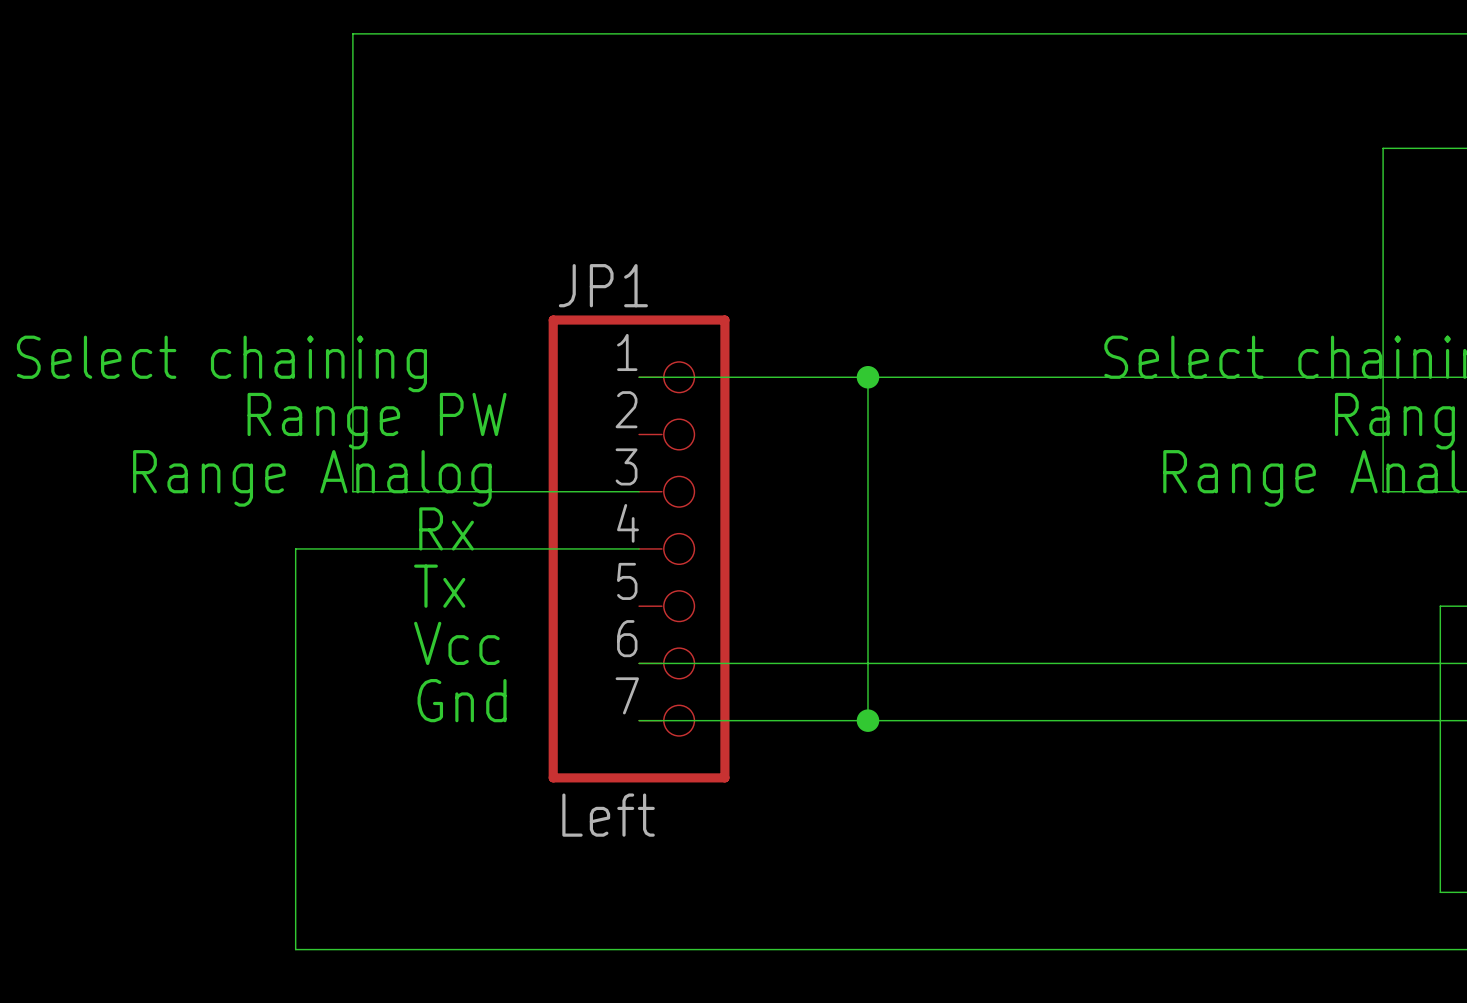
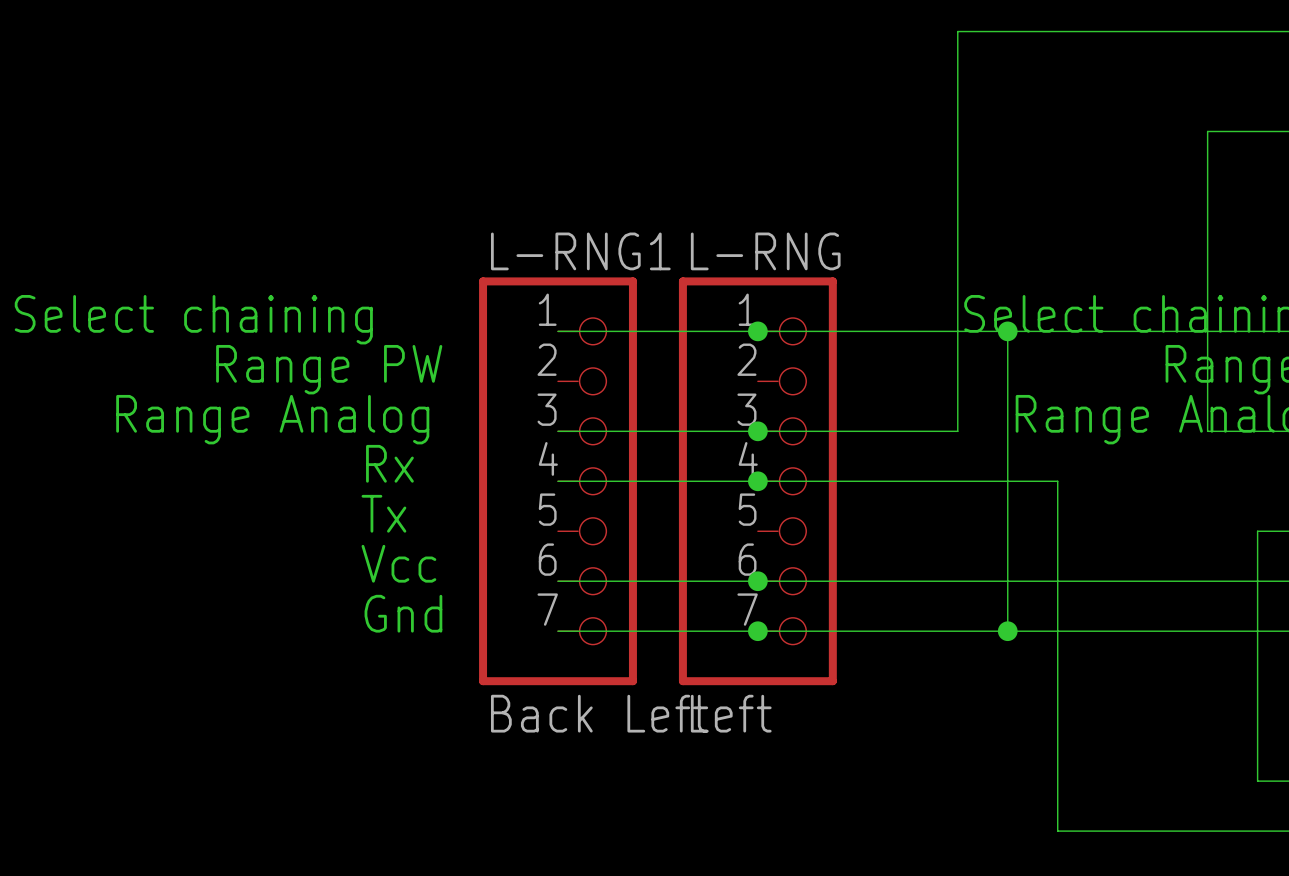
wire: (1096, 33) (352, 33) (352, 491) (639, 491) -> (957, 31) (957, 431) (557, 431)
JP1 name: JP1 (603, 285) -> L-RNG1 (580, 251)
wire: (867, 377) (867, 720) -> (1007, 331) (1007, 631)
junction: none -> (1007, 331)
junction: none -> (757, 431)
wire: (639, 548) (295, 548) (295, 949) (1211, 949) -> (557, 481) (1057, 481) (1057, 831)
L-RNG: none -> Left (757, 481)
junction: none -> (757, 481)
junction: none -> (757, 581)
junction: none -> (1007, 631)
JP1 value: Left (608, 815) -> Back Left (599, 713)

